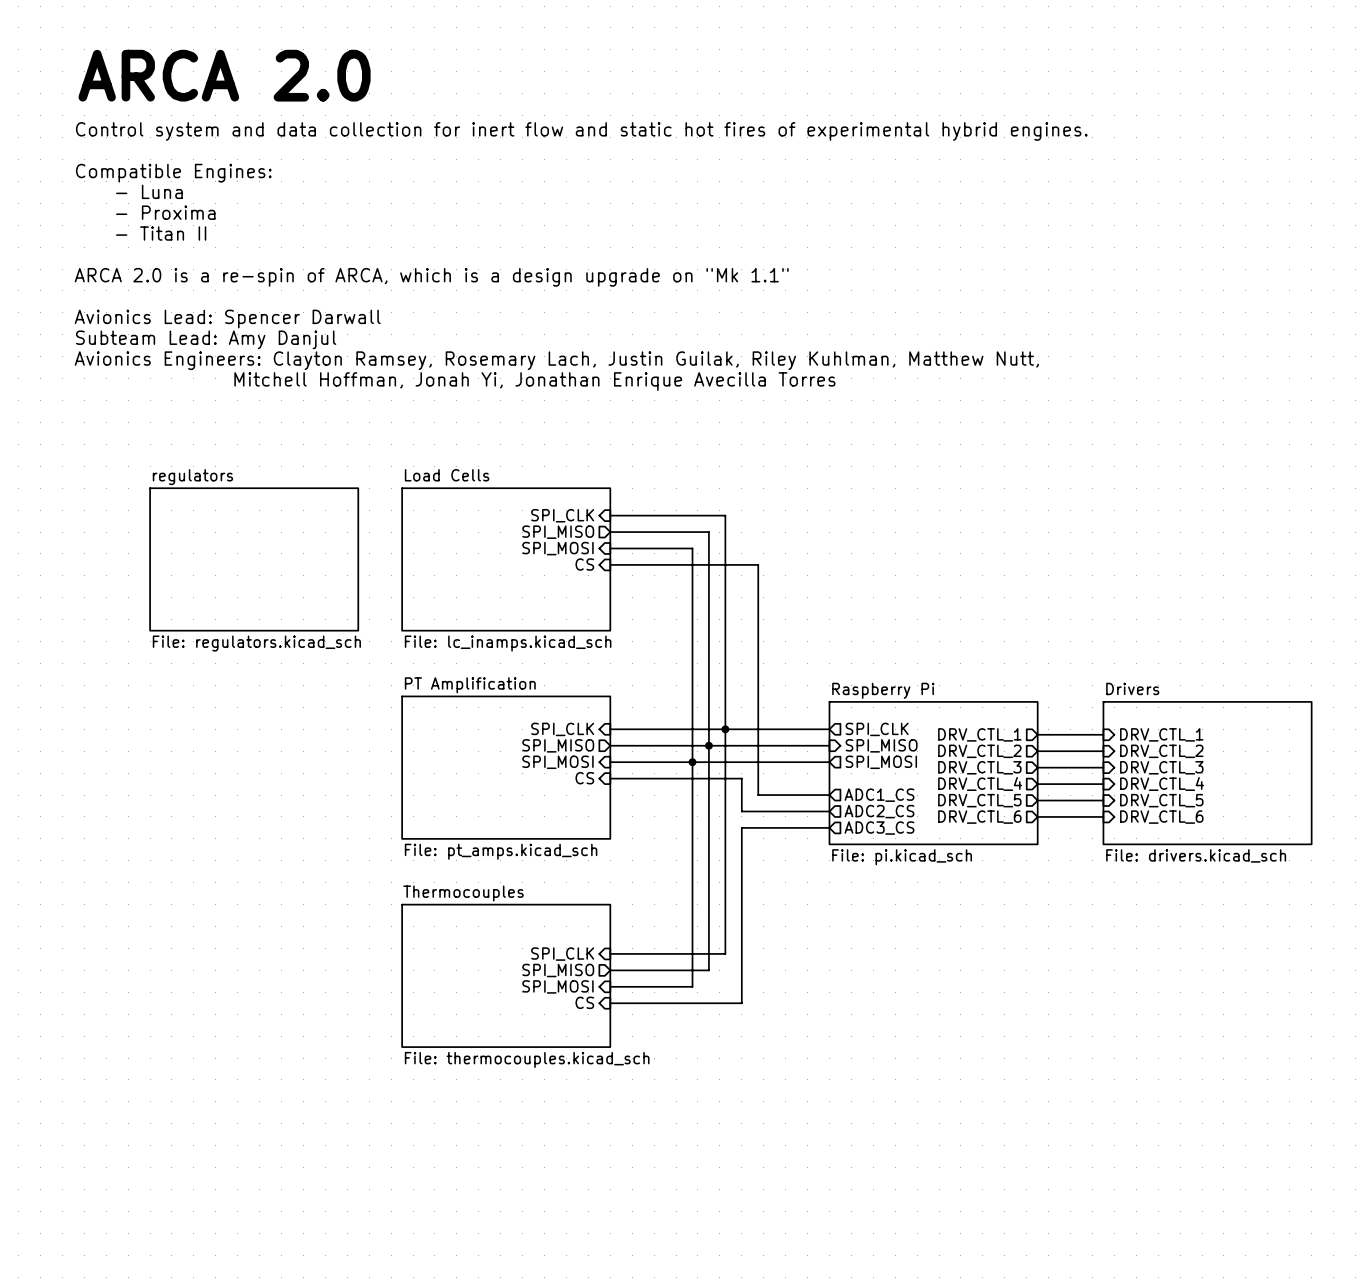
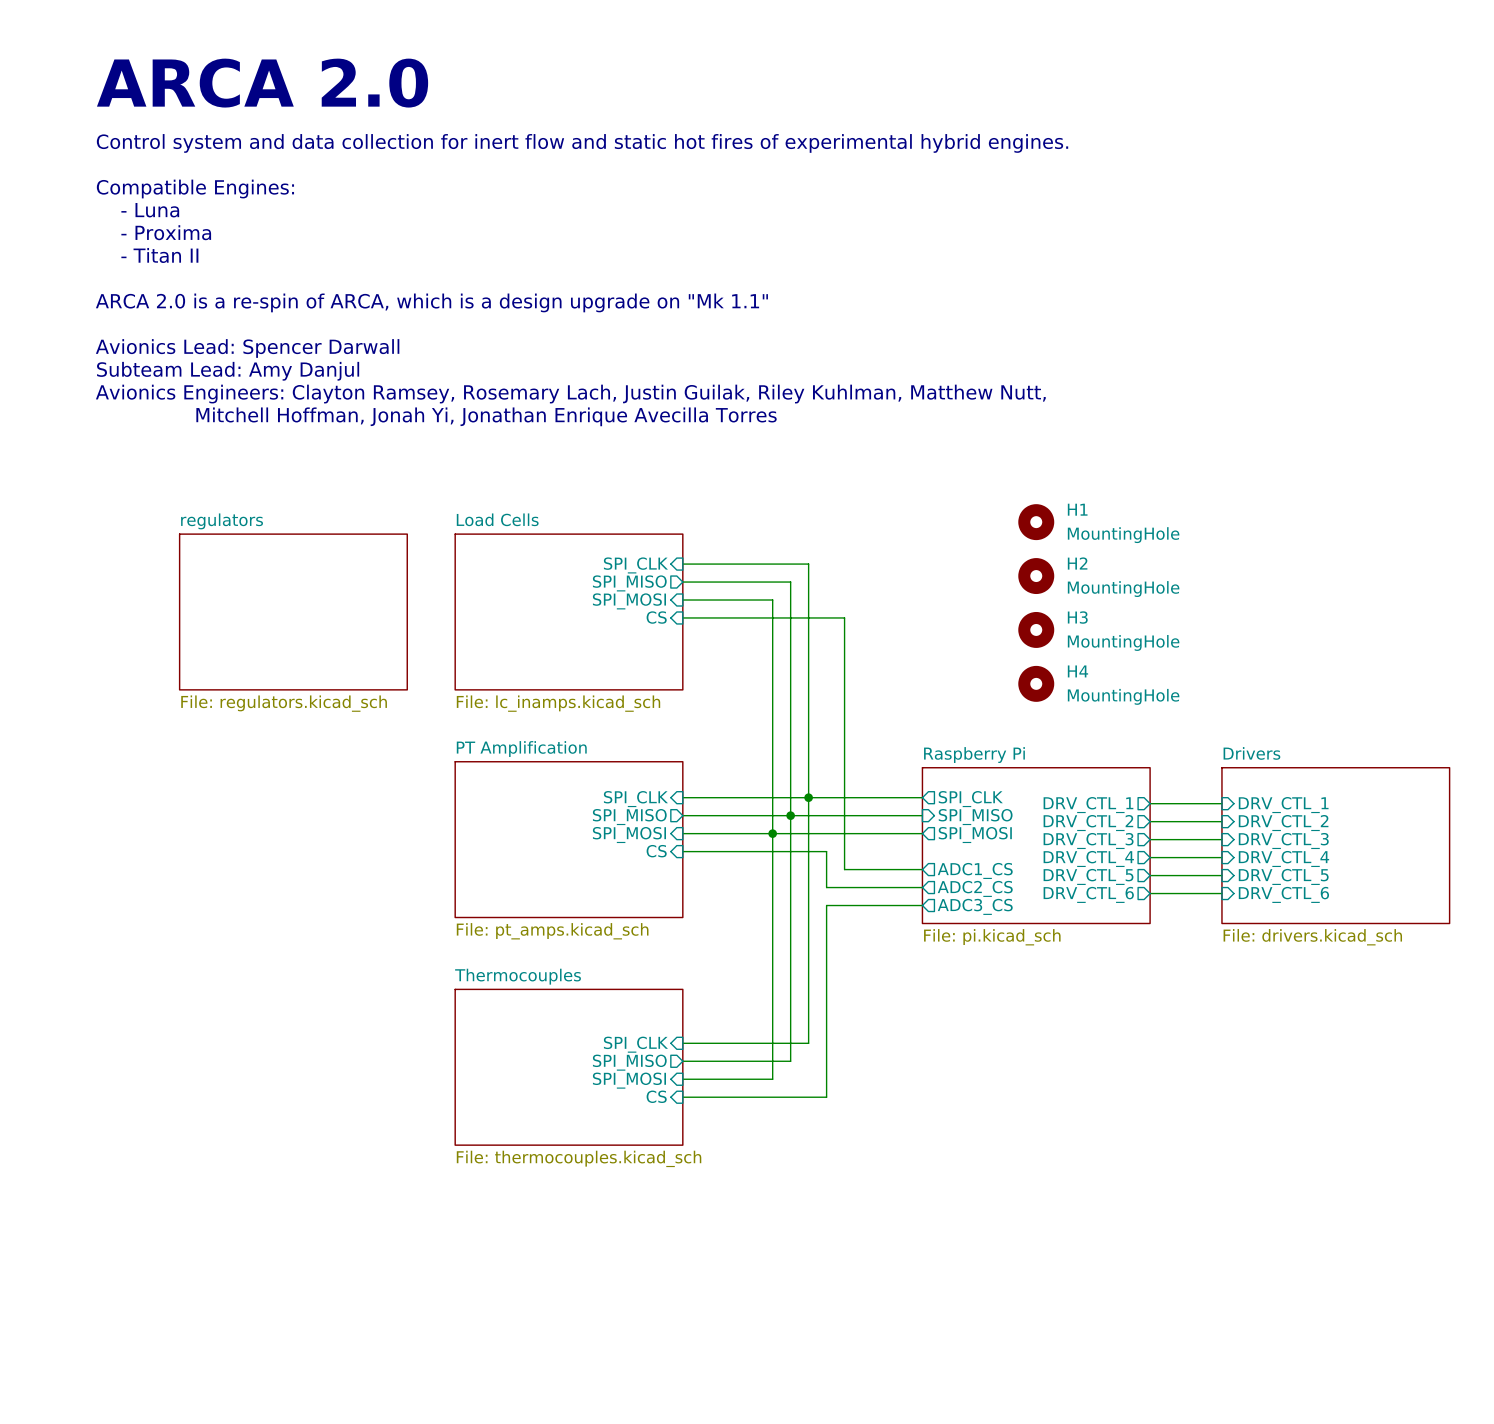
H1: none -> MountingHole (1036, 522)
H2: none -> MountingHole (1036, 576)
H3: none -> MountingHole (1036, 629)
H4: none -> MountingHole (1036, 683)

